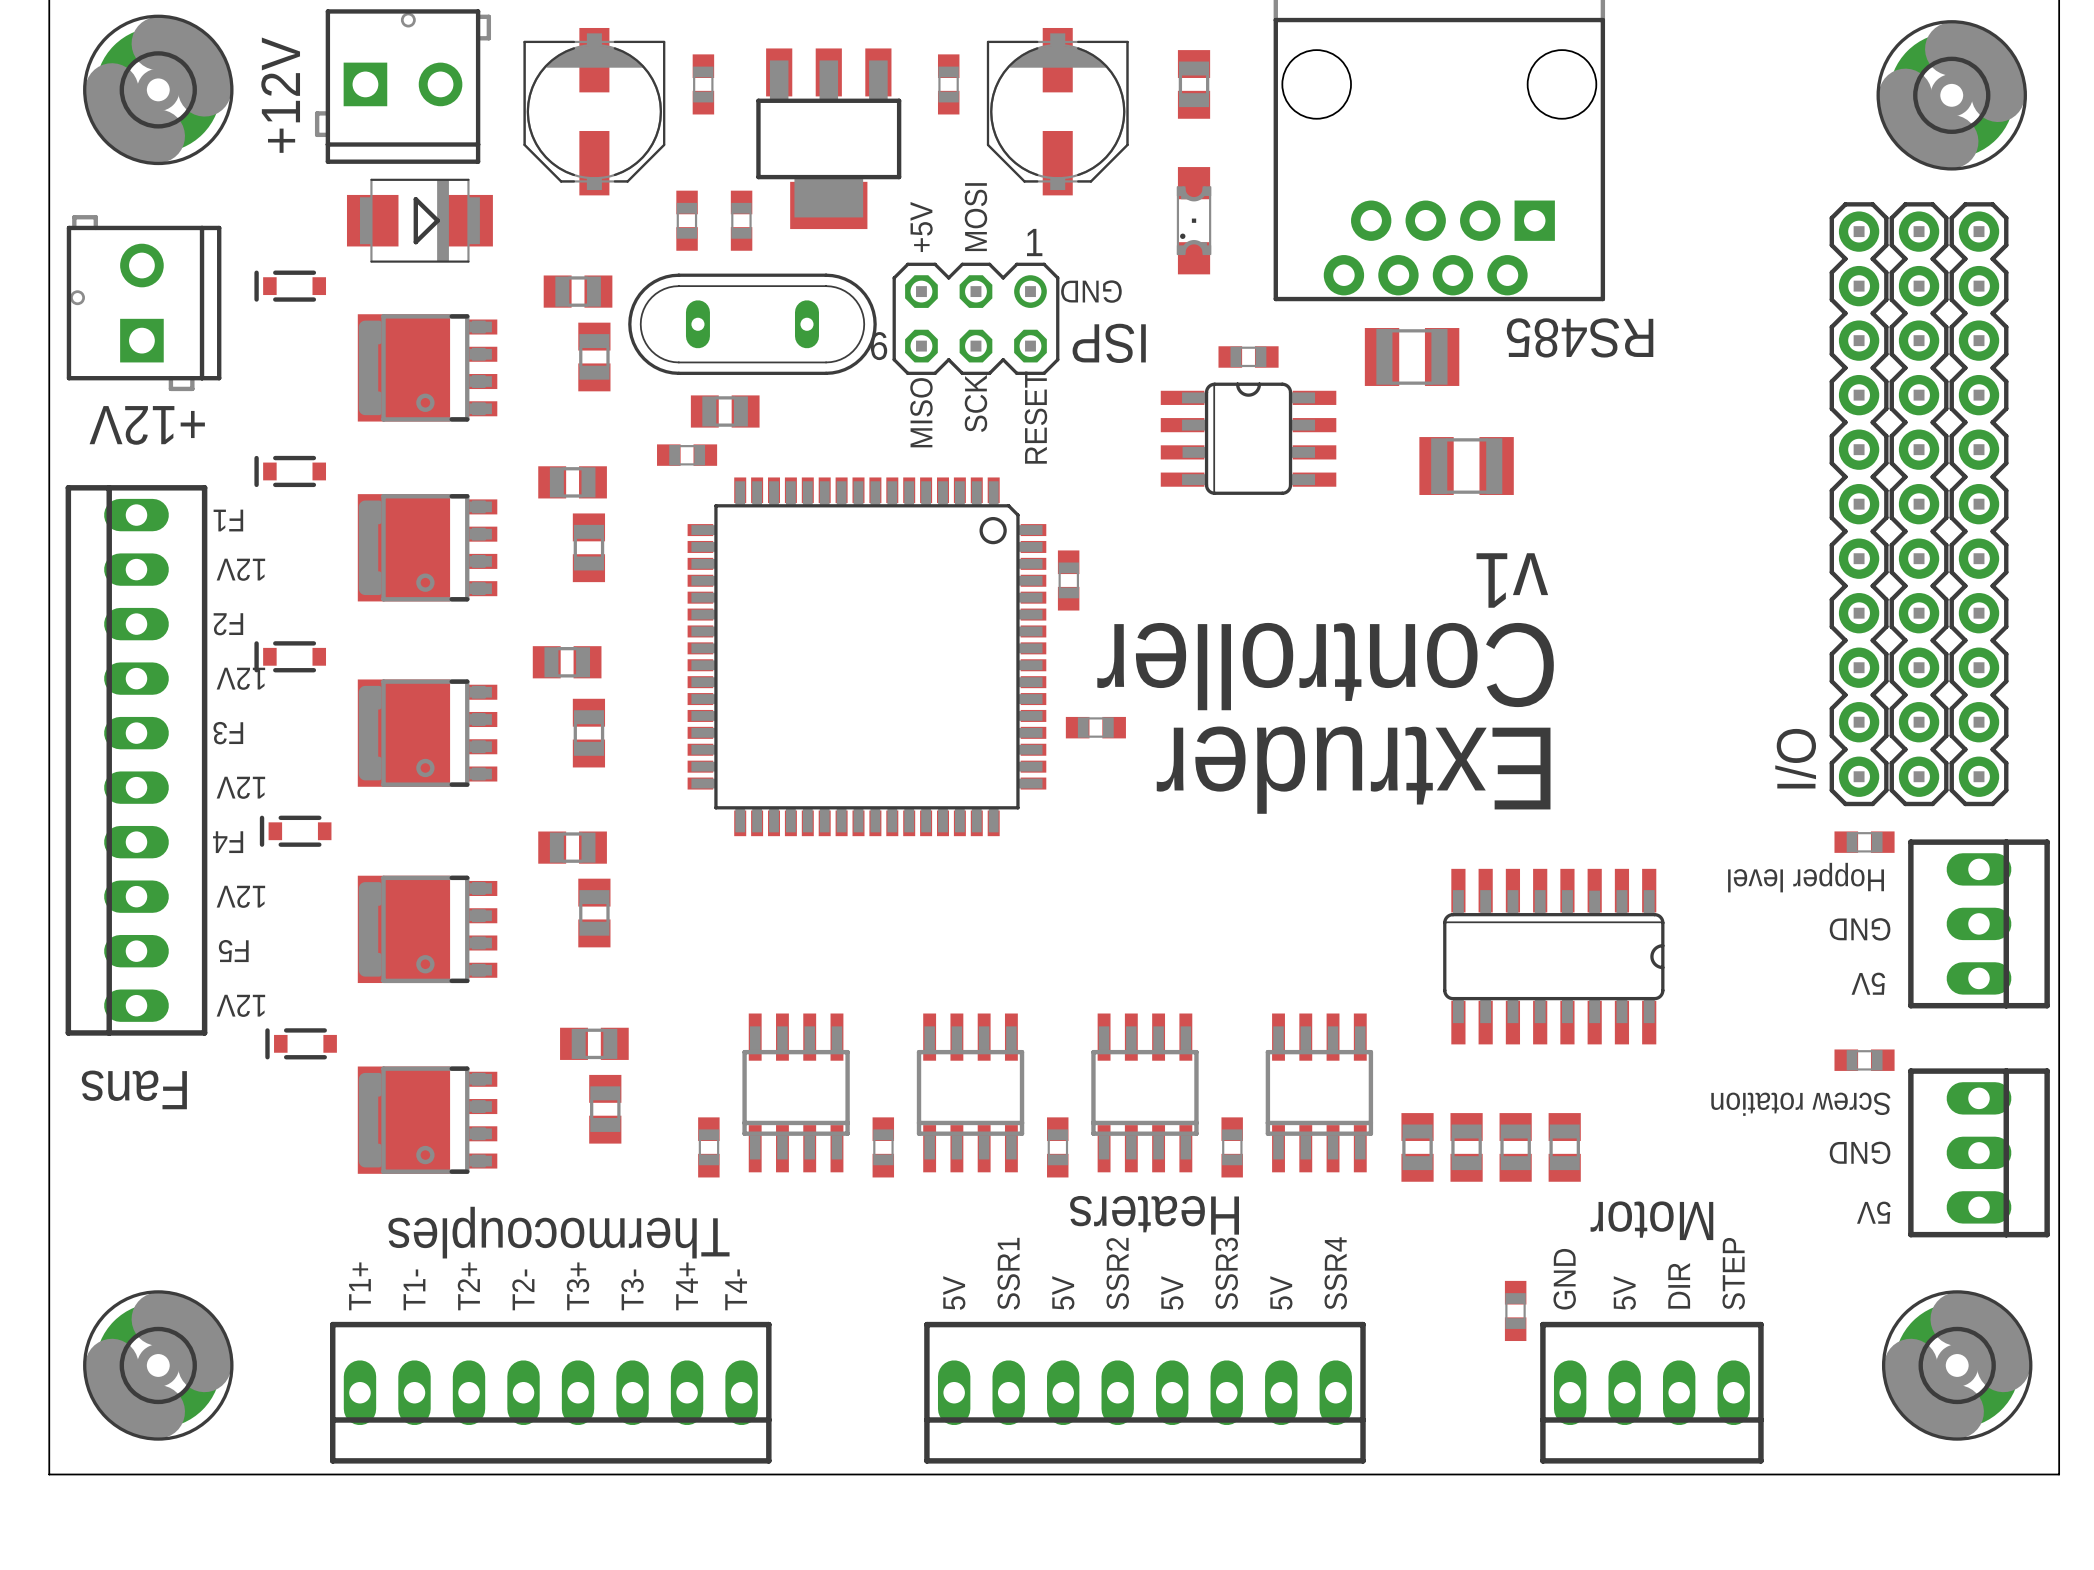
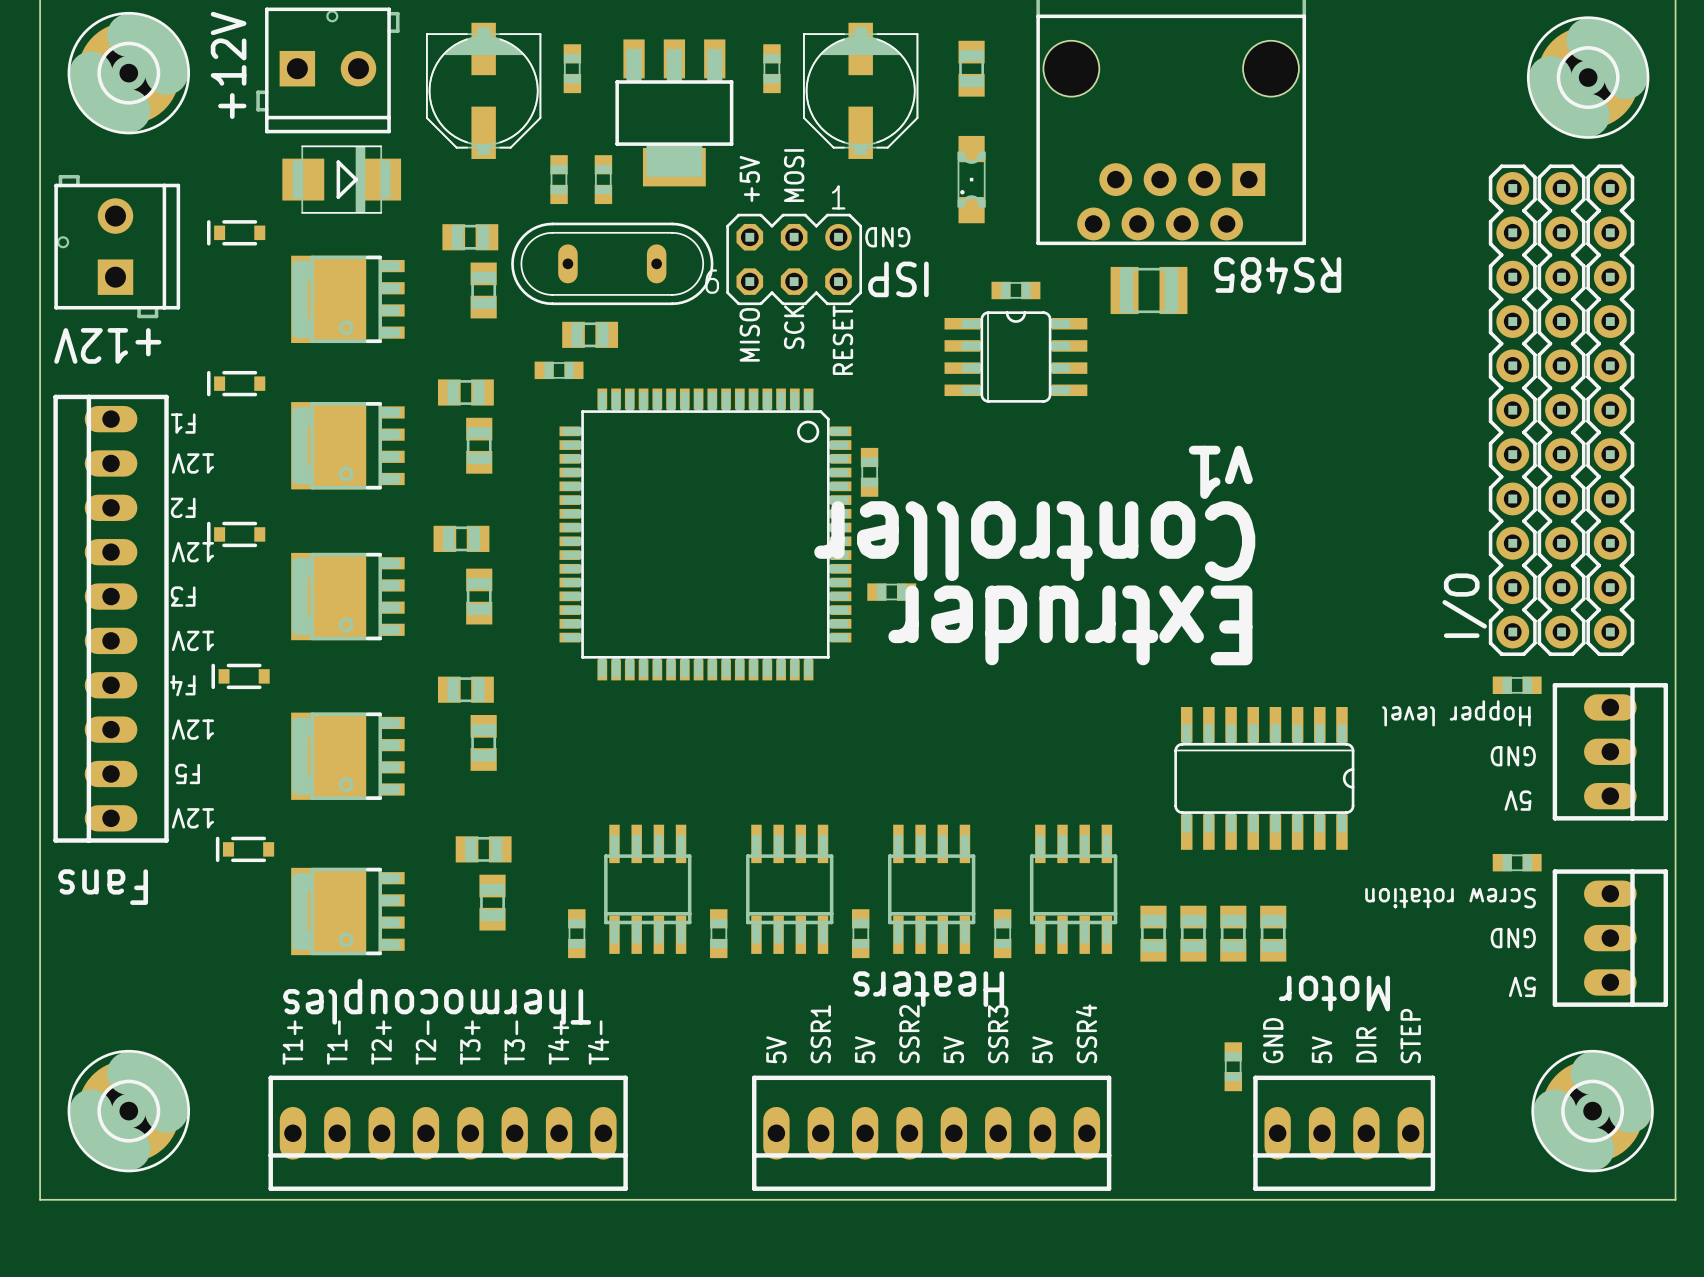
part: (1466, 466) -> none

